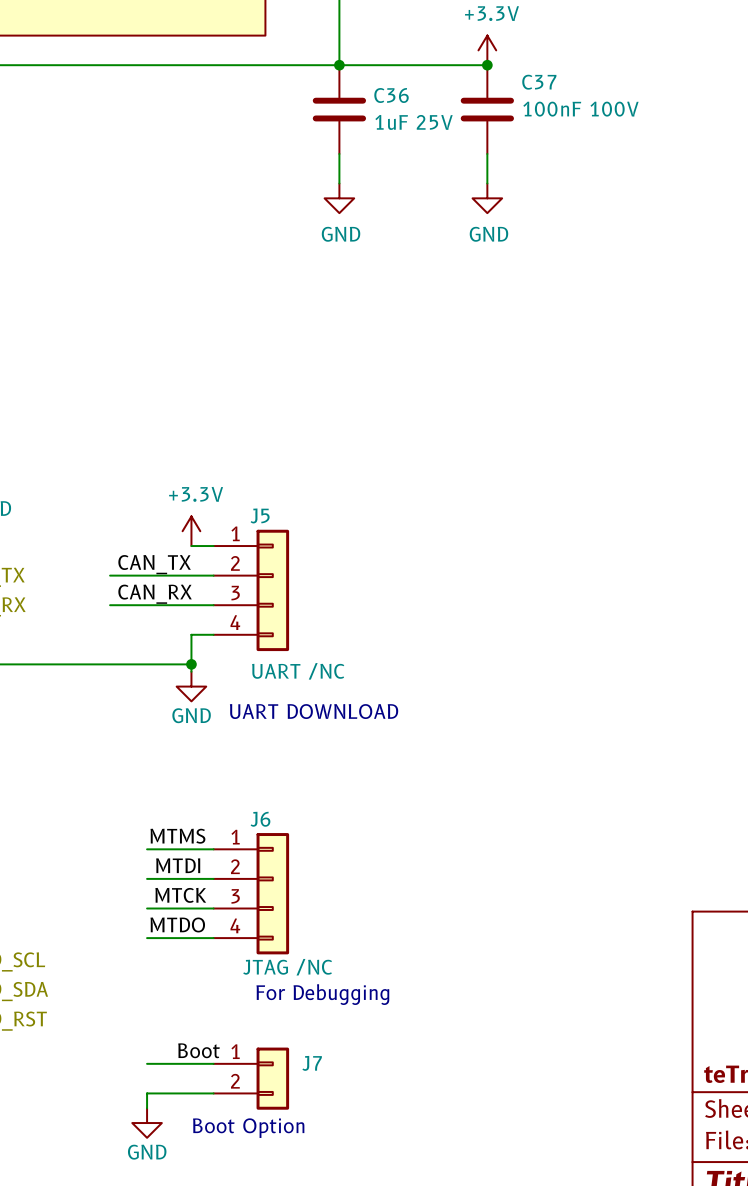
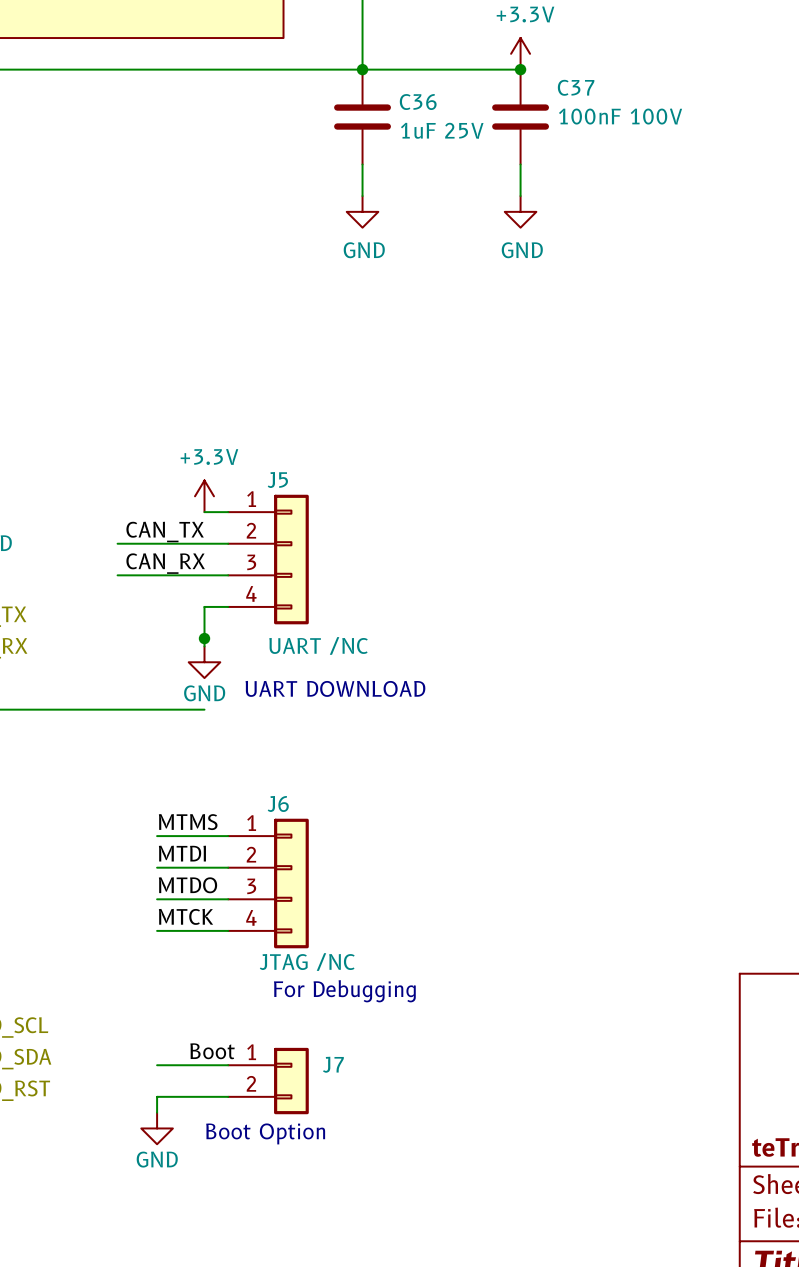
power symbol position: +3.3V (191, 531) -> +3.3V (204, 496)
wire: (191, 546) (213, 546) -> (204, 512) (228, 512)
label position: CAN_TX (154, 564) -> CAN_TX (165, 531)
wire: (110, 575) (213, 575) -> (117, 543) (228, 543)
J5 position: (251, 590) -> (268, 559)
label position: CAN_RX (155, 594) -> CAN_RX (165, 563)
wire: (110, 605) (213, 605) -> (117, 575) (228, 575)
wire: (213, 634) (191, 634) (191, 671) -> (228, 606) (204, 606) (204, 646)
junction position: (191, 664) -> (204, 638)
power symbol position: GND (191, 686) -> GND (204, 662)
text position: UART DOWNLOAD (314, 711) -> UART DOWNLOAD (335, 688)
label position: MTMS (177, 836) -> MTMS (188, 822)
wire: (147, 849) (213, 849) -> (157, 836) (228, 836)
label position: MTDI (178, 865) -> MTDI (182, 853)
wire: (147, 878) (213, 878) -> (157, 867) (228, 867)
J6 position: (251, 893) -> (268, 883)
label position: MTCK (180, 895) -> MTCK (186, 916)
wire: (147, 908) (213, 908) -> (157, 899) (228, 899)
label position: MTDO (177, 924) -> MTDO (188, 885)
wire: (147, 938) (213, 938) -> (157, 930) (228, 930)
text position: For Debugging (322, 994) -> For Debugging (344, 991)
label position: Boot (198, 1050) -> Boot (212, 1051)
wire: (147, 1063) (213, 1063) -> (157, 1065) (228, 1065)
J7 position: (251, 1078) -> (268, 1081)
wire: (213, 1093) (147, 1093) (147, 1108) -> (228, 1096) (157, 1096) (157, 1112)
power symbol position: GND (147, 1123) -> GND (157, 1128)
text position: Boot Option (248, 1128) -> Boot Option (265, 1133)

